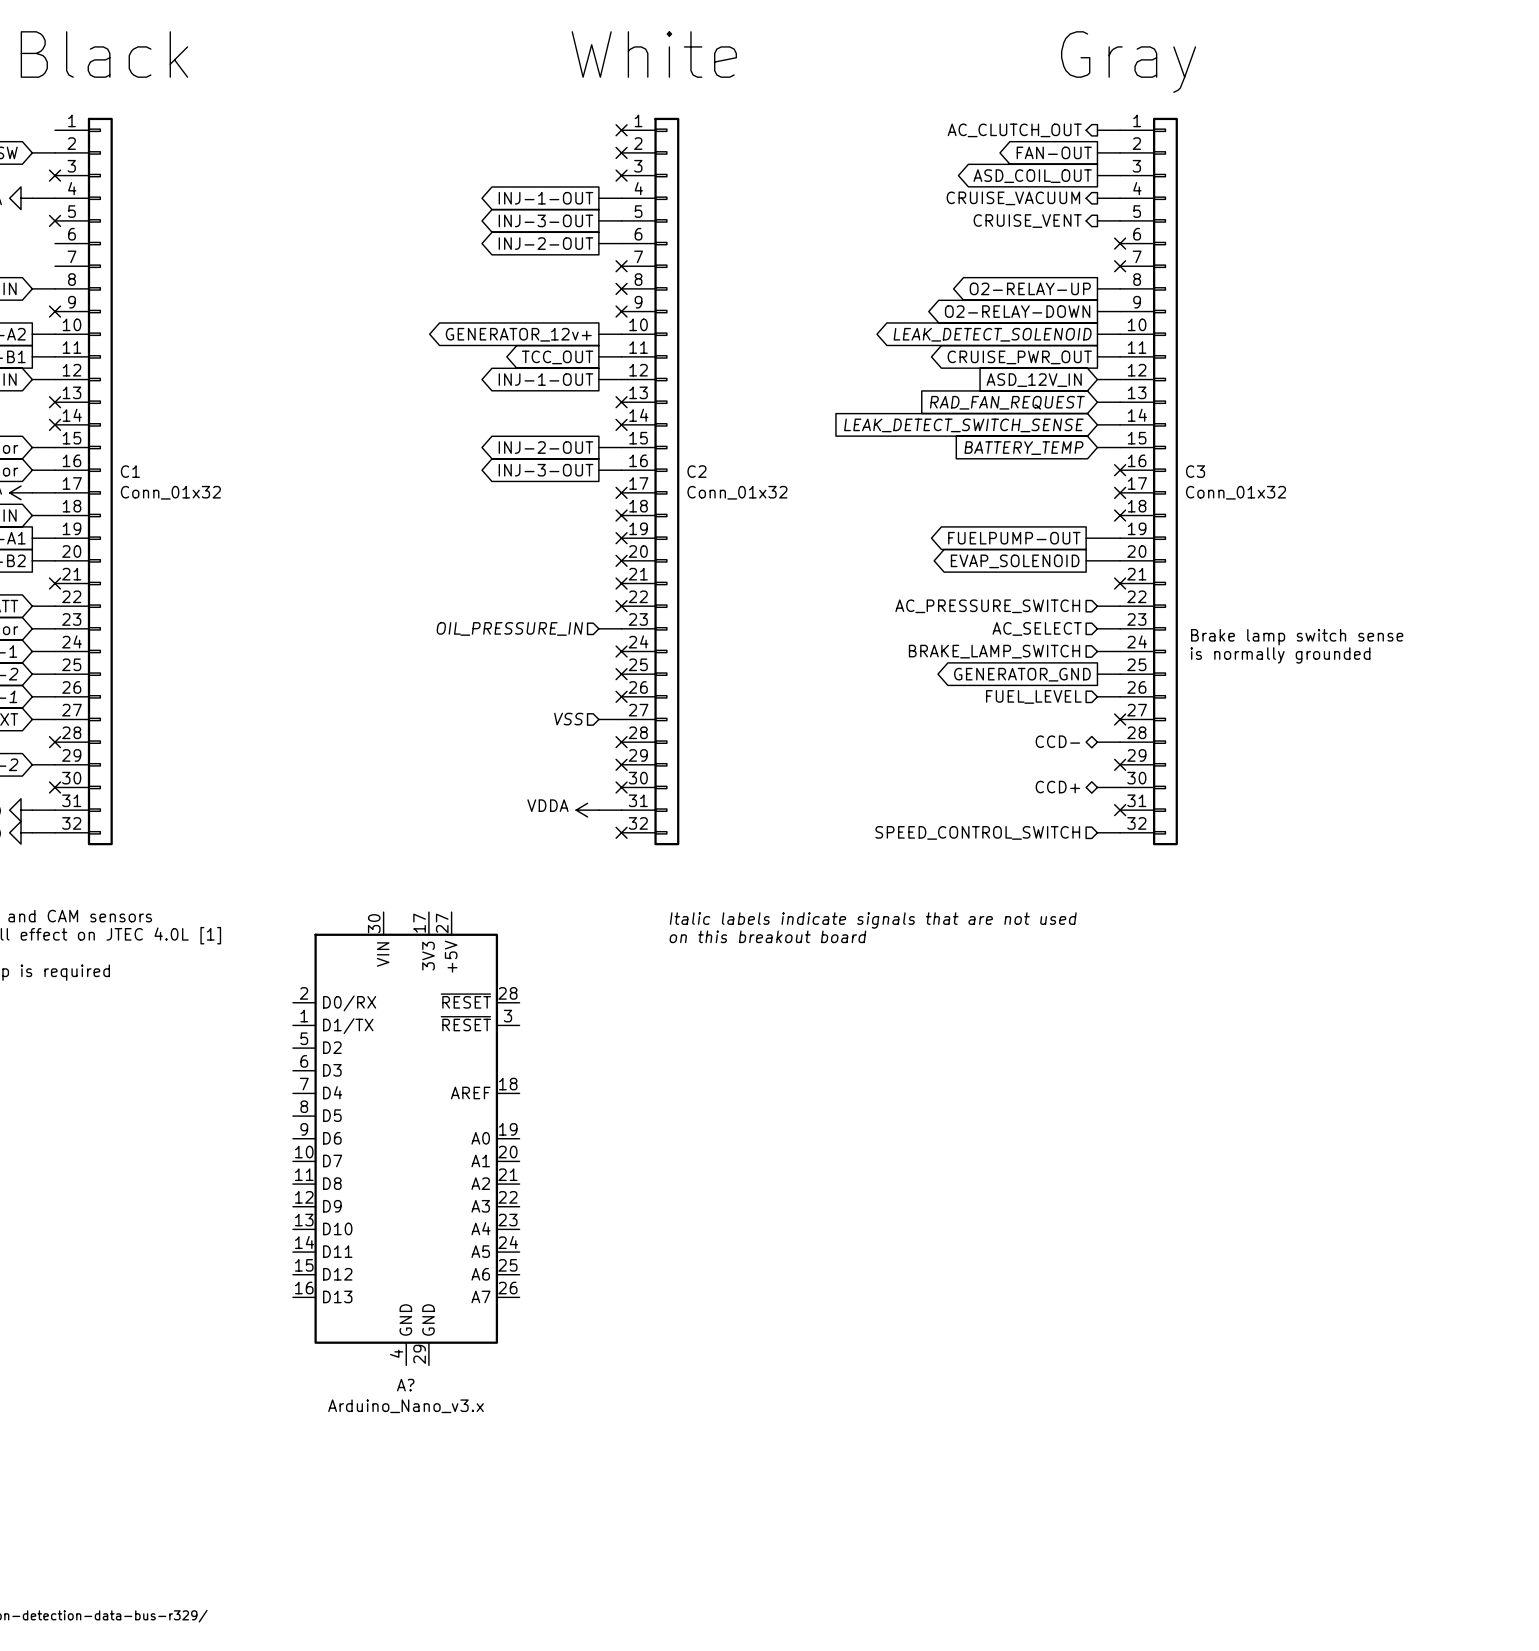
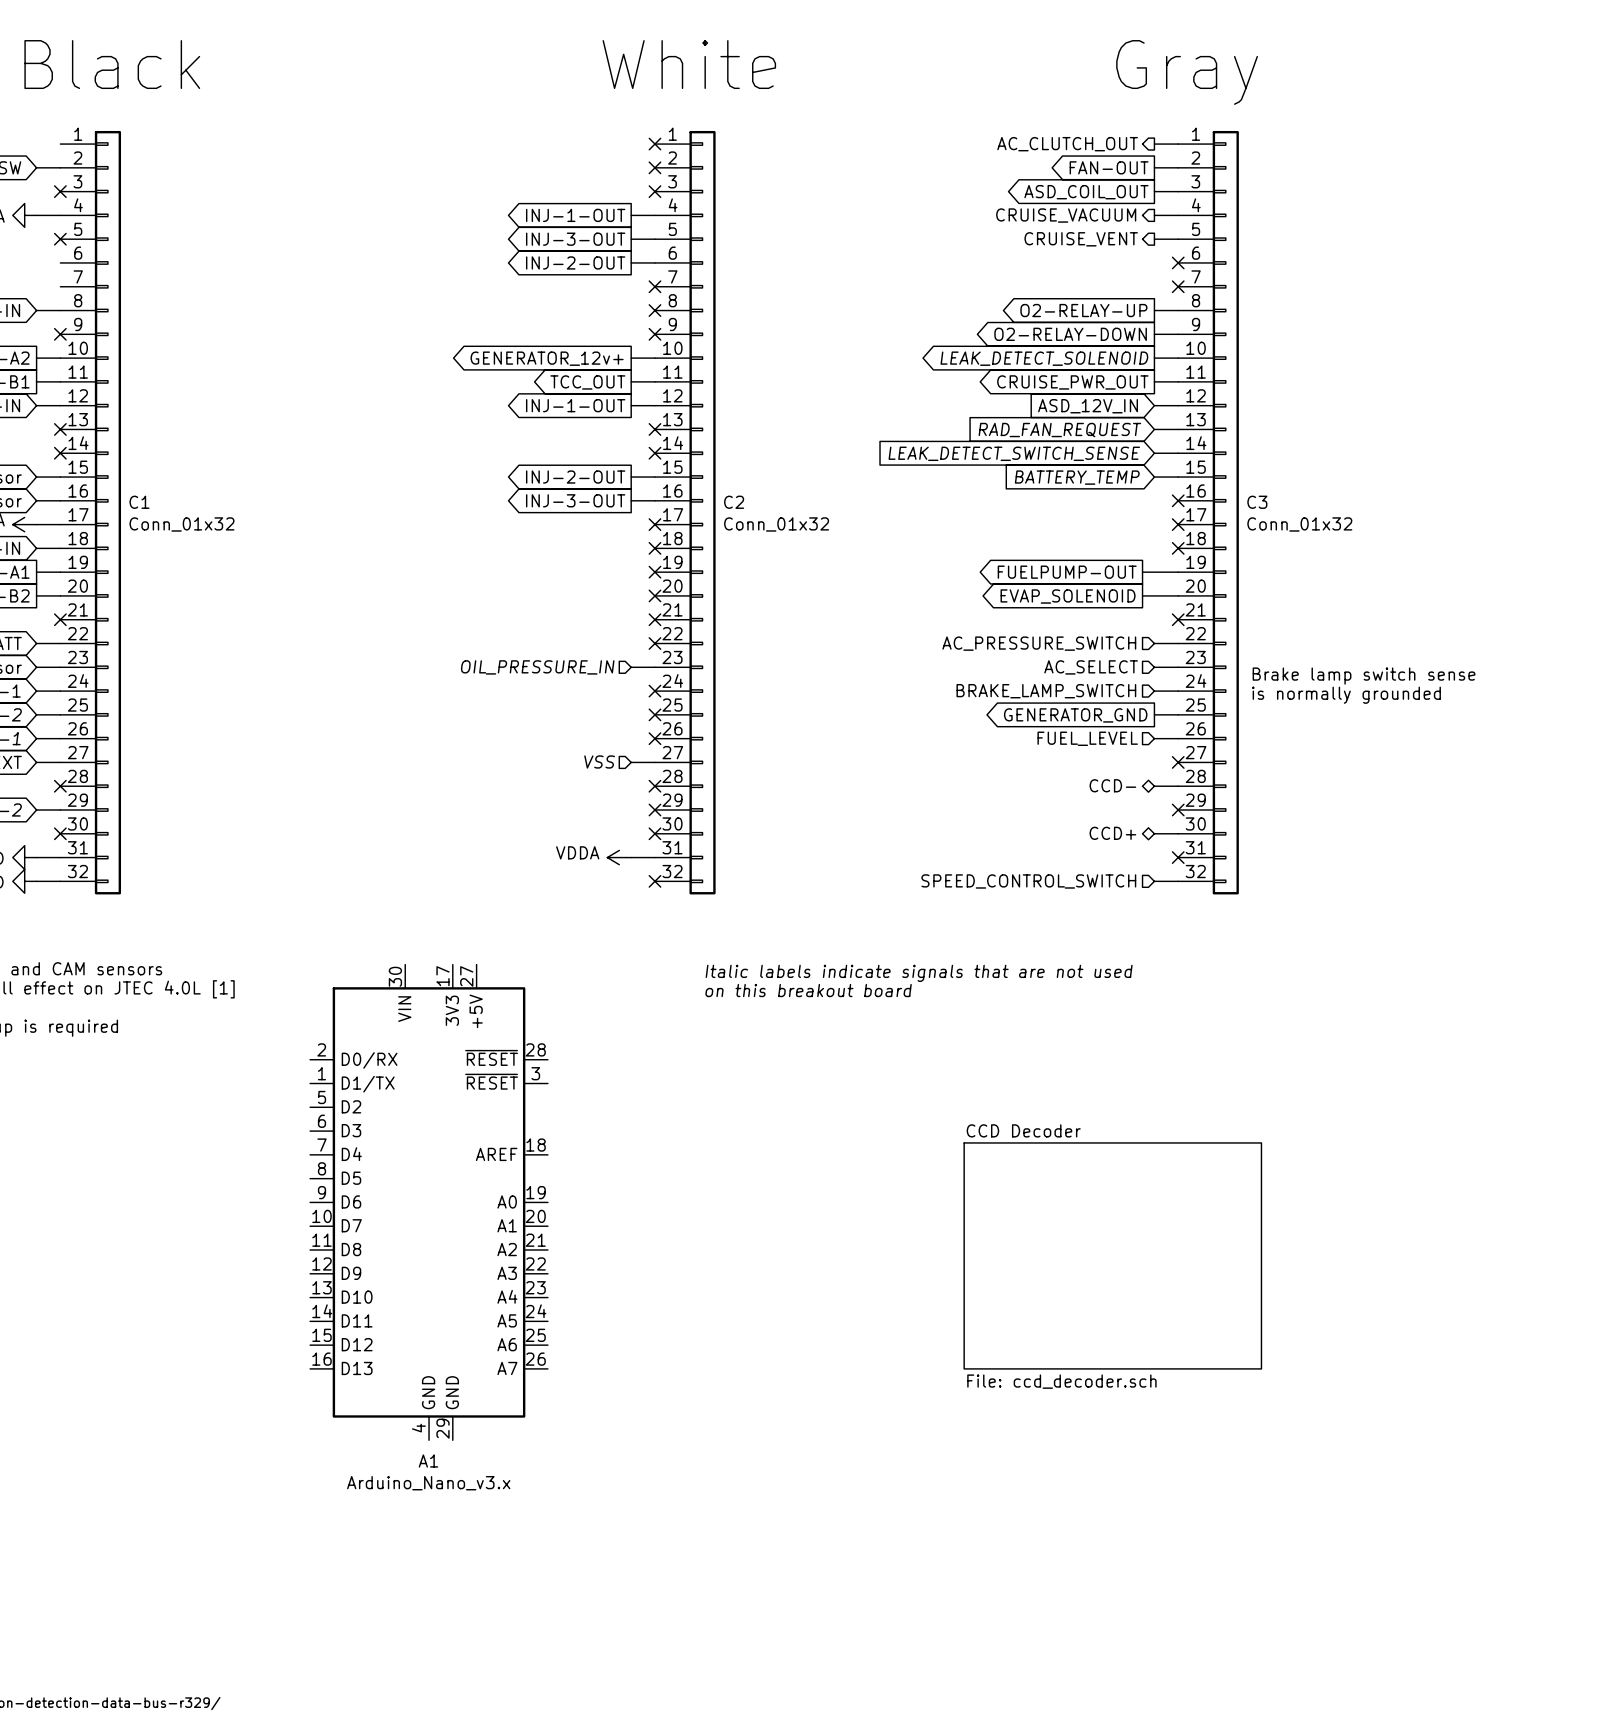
sheet CCD Decoder: none -> File: ccd_decoder.sch (1112, 1255)
A? name: A? (405, 1385) -> A1 (428, 1460)

